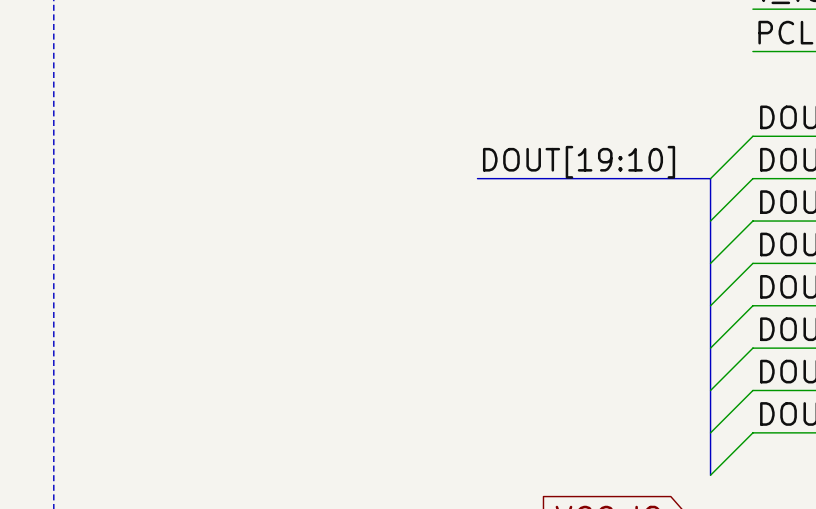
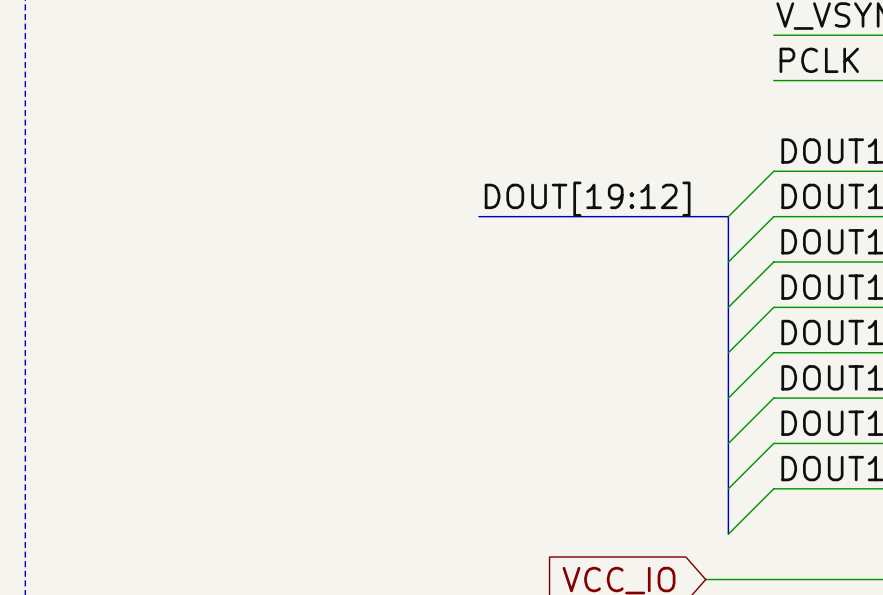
label: DOUT[19:10] (579, 162) -> DOUT[19:12] (587, 199)

